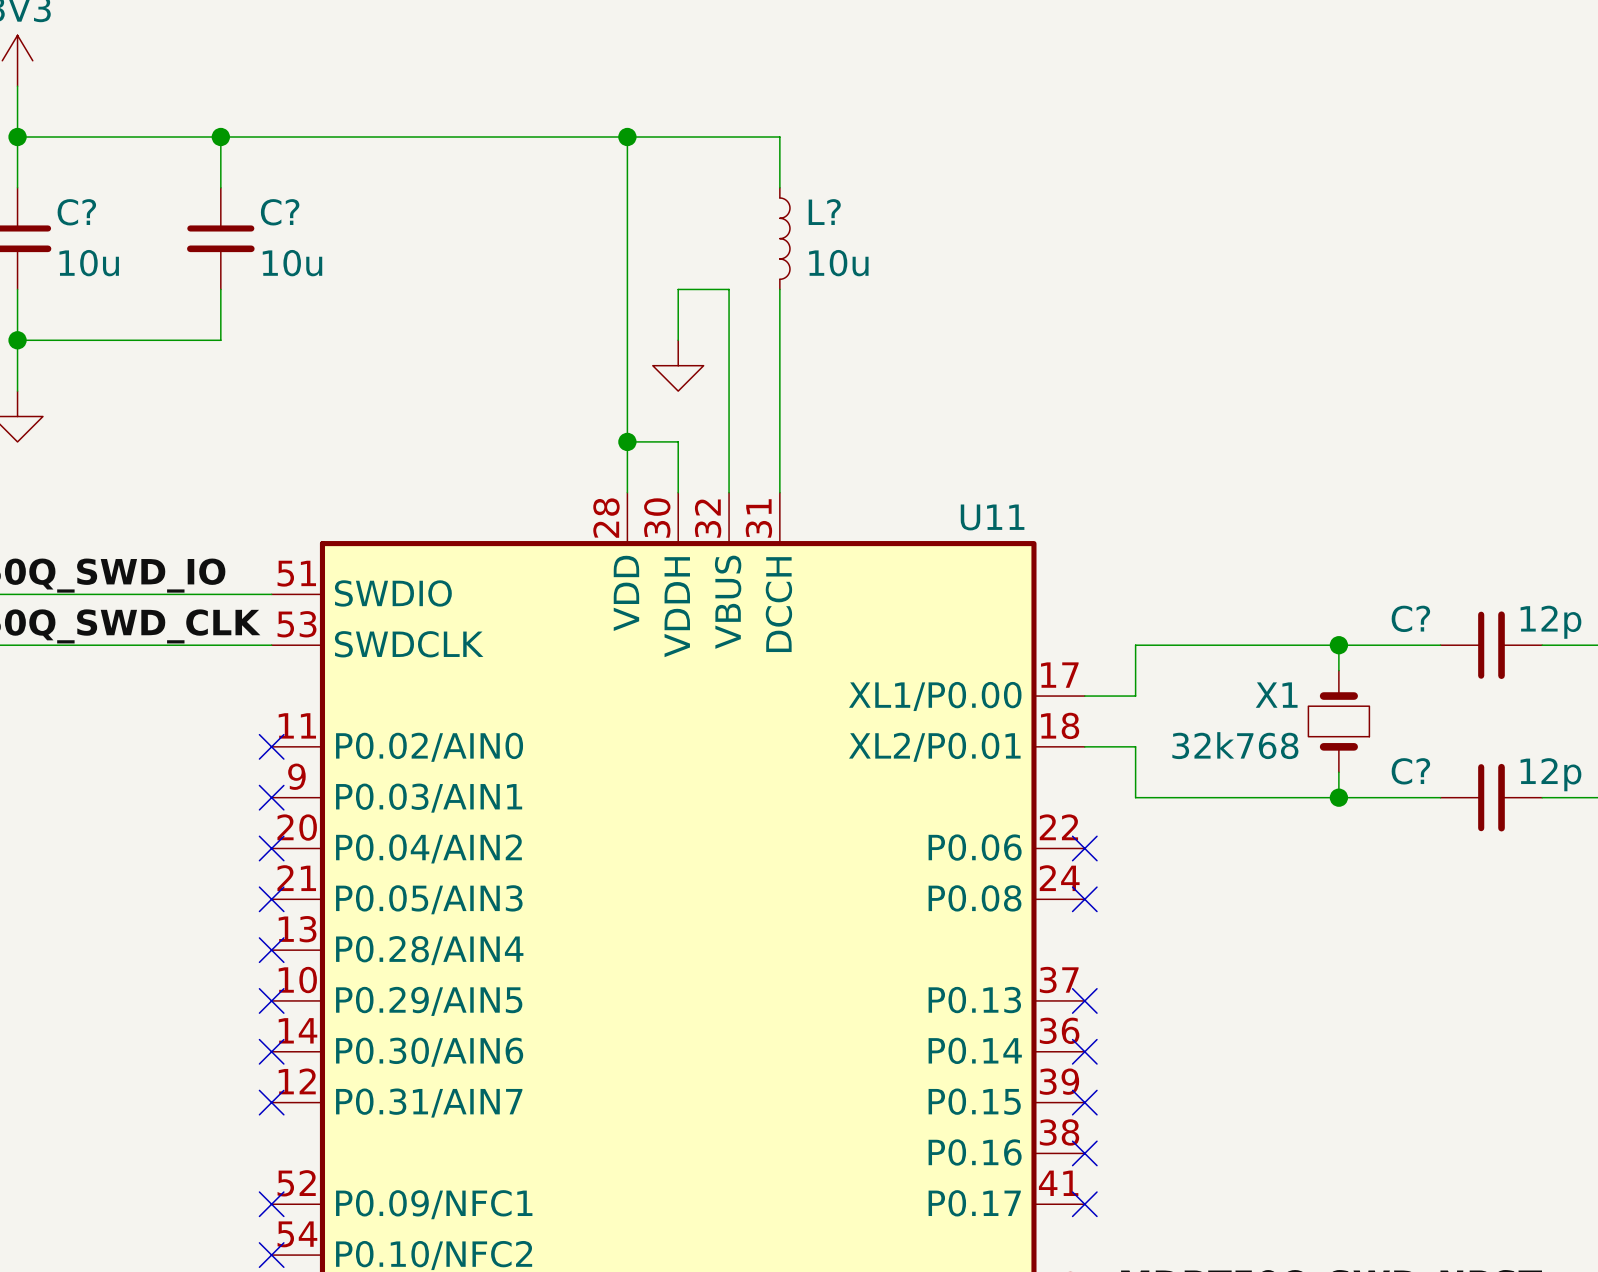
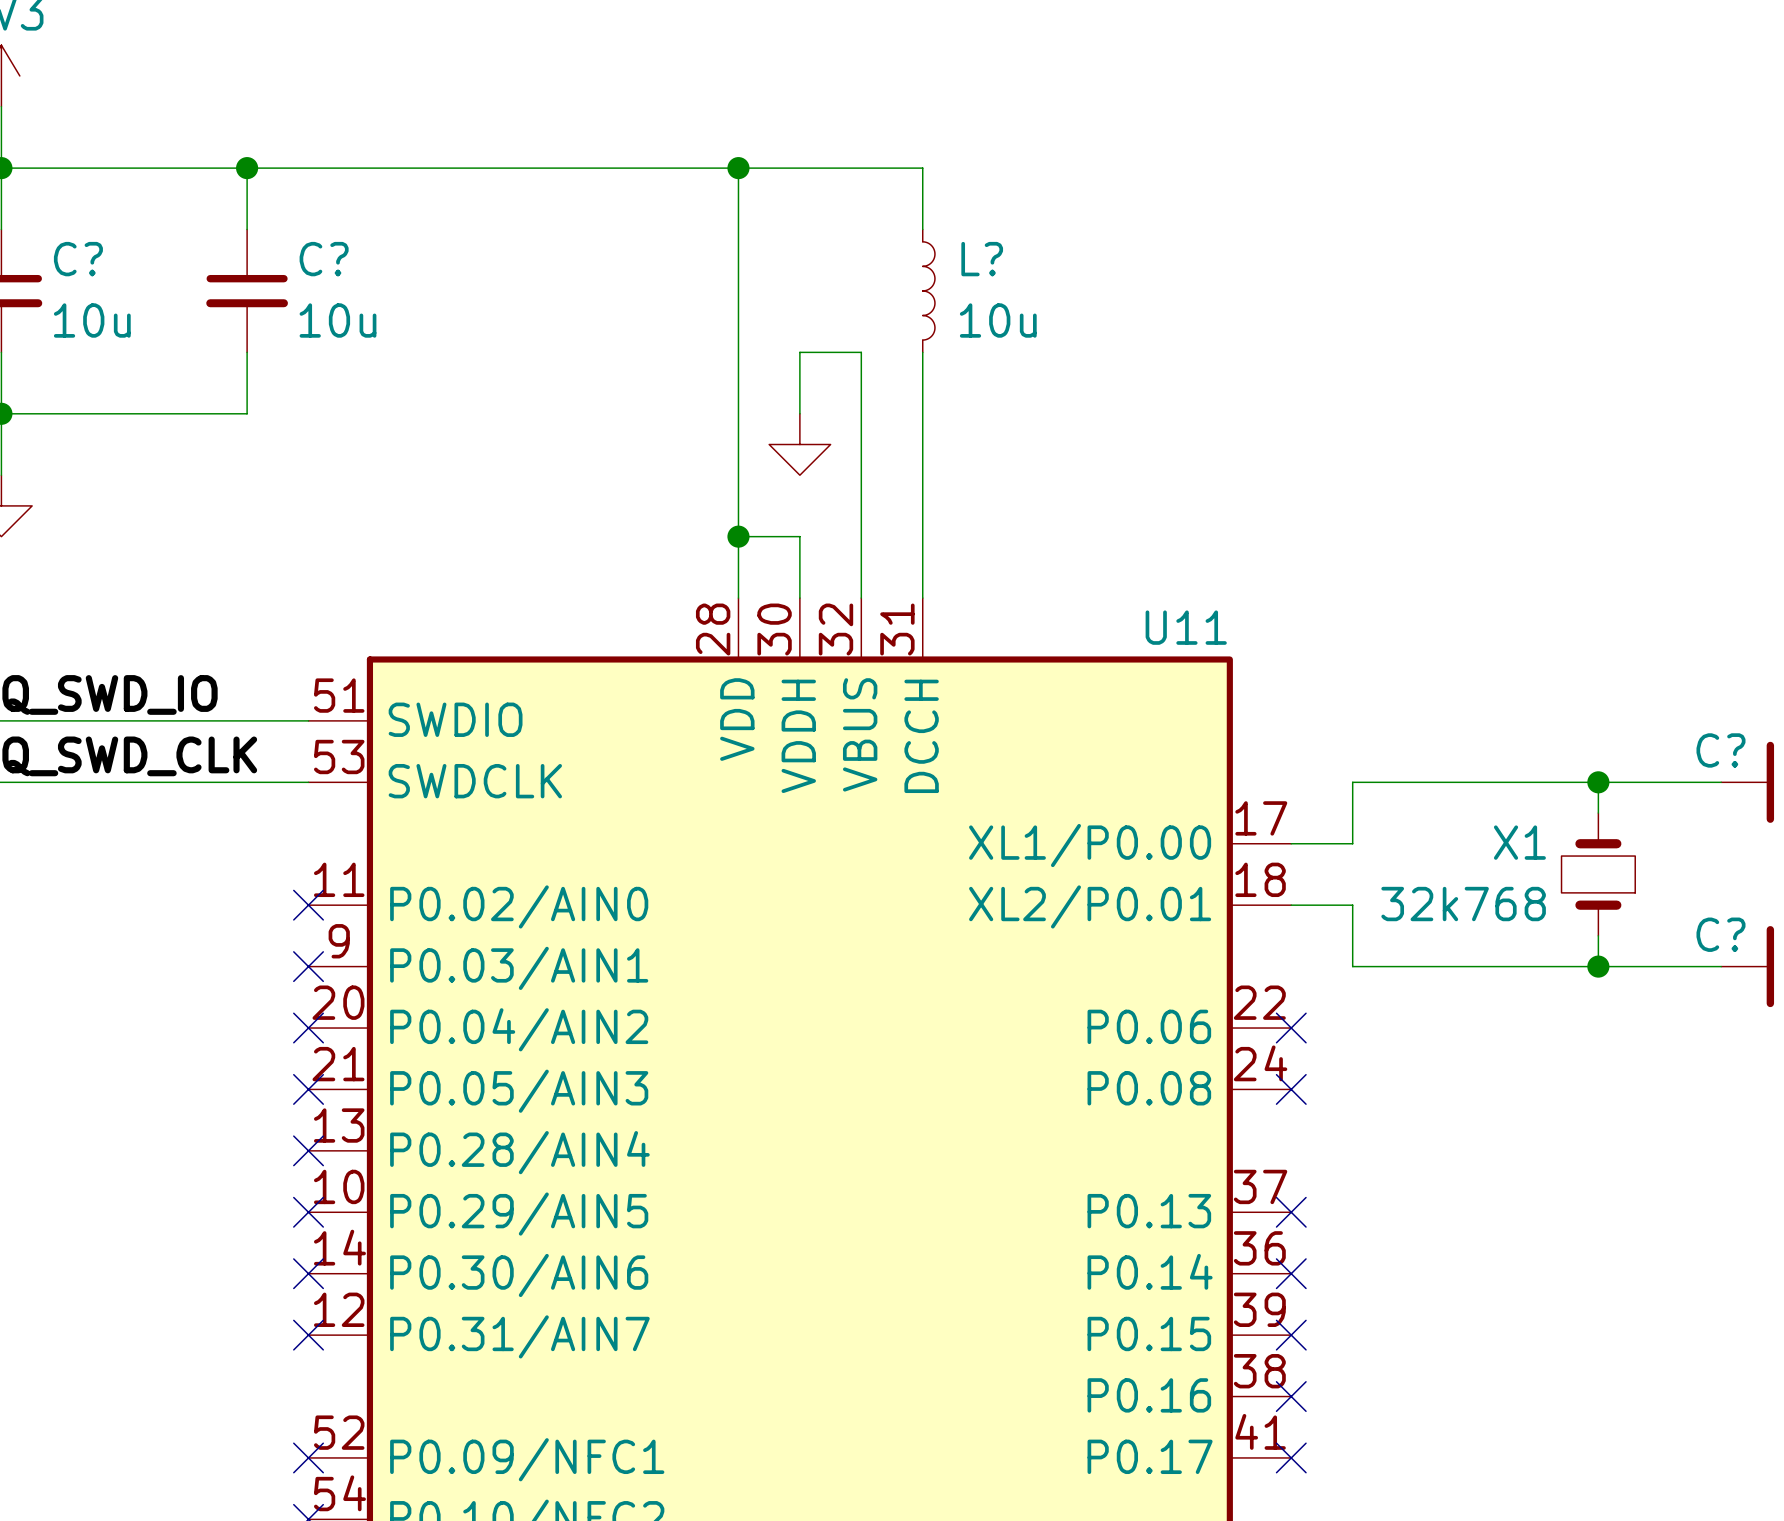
C? name position: C? (1410, 618) -> C? (1720, 750)
C? name position: C? (1410, 771) -> C? (1720, 934)

